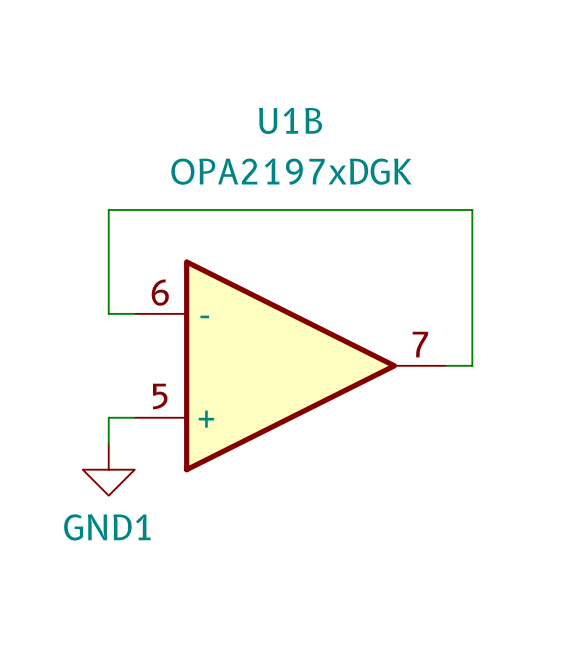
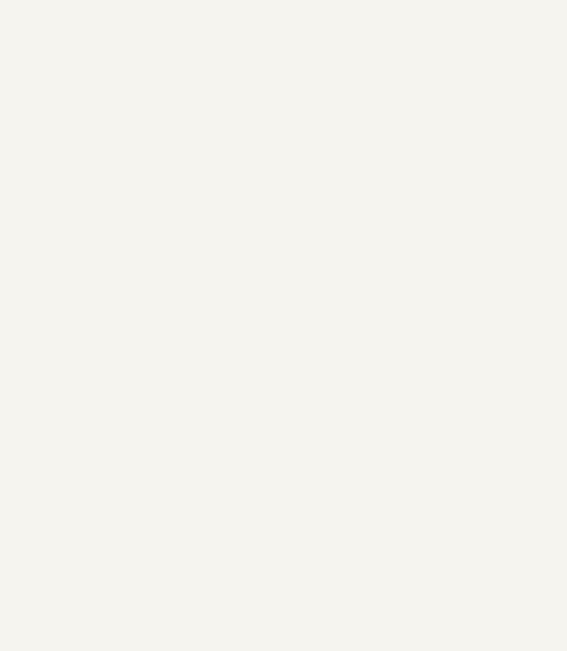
wire: (134, 313) (108, 313) (108, 210) (472, 210) (472, 365) (446, 365) -> none
U1B: OPA2197xDGK (290, 365) -> none
wire: (134, 417) (108, 417) (108, 443) -> none
power symbol: GND1 (108, 469) -> none

